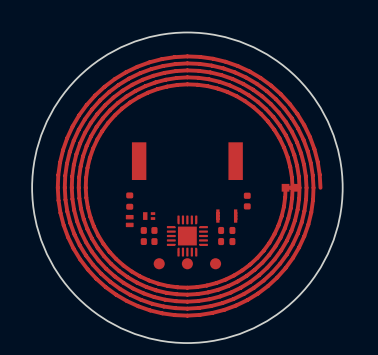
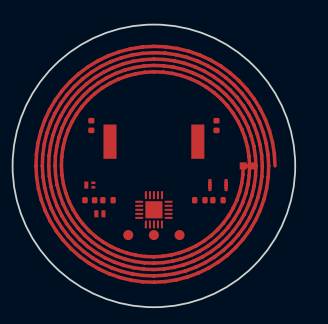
part: none -> (91, 125)
part rotation: 0° (129, 201) -> 90° clockwise (107, 200)
part position: (129, 201) -> (107, 200)
part position: (247, 201) -> (216, 125)
part position: (149, 216) -> (89, 185)
part position: (226, 216) -> (218, 185)
part rotation: 0° (129, 221) -> 90° clockwise (99, 213)
part position: (129, 221) -> (99, 213)
part: none -> (89, 200)
part: none -> (199, 200)
part: none -> (218, 200)
part: (149, 230) -> none
part: (226, 230) -> none
part: (149, 241) -> none
part: (226, 241) -> none

